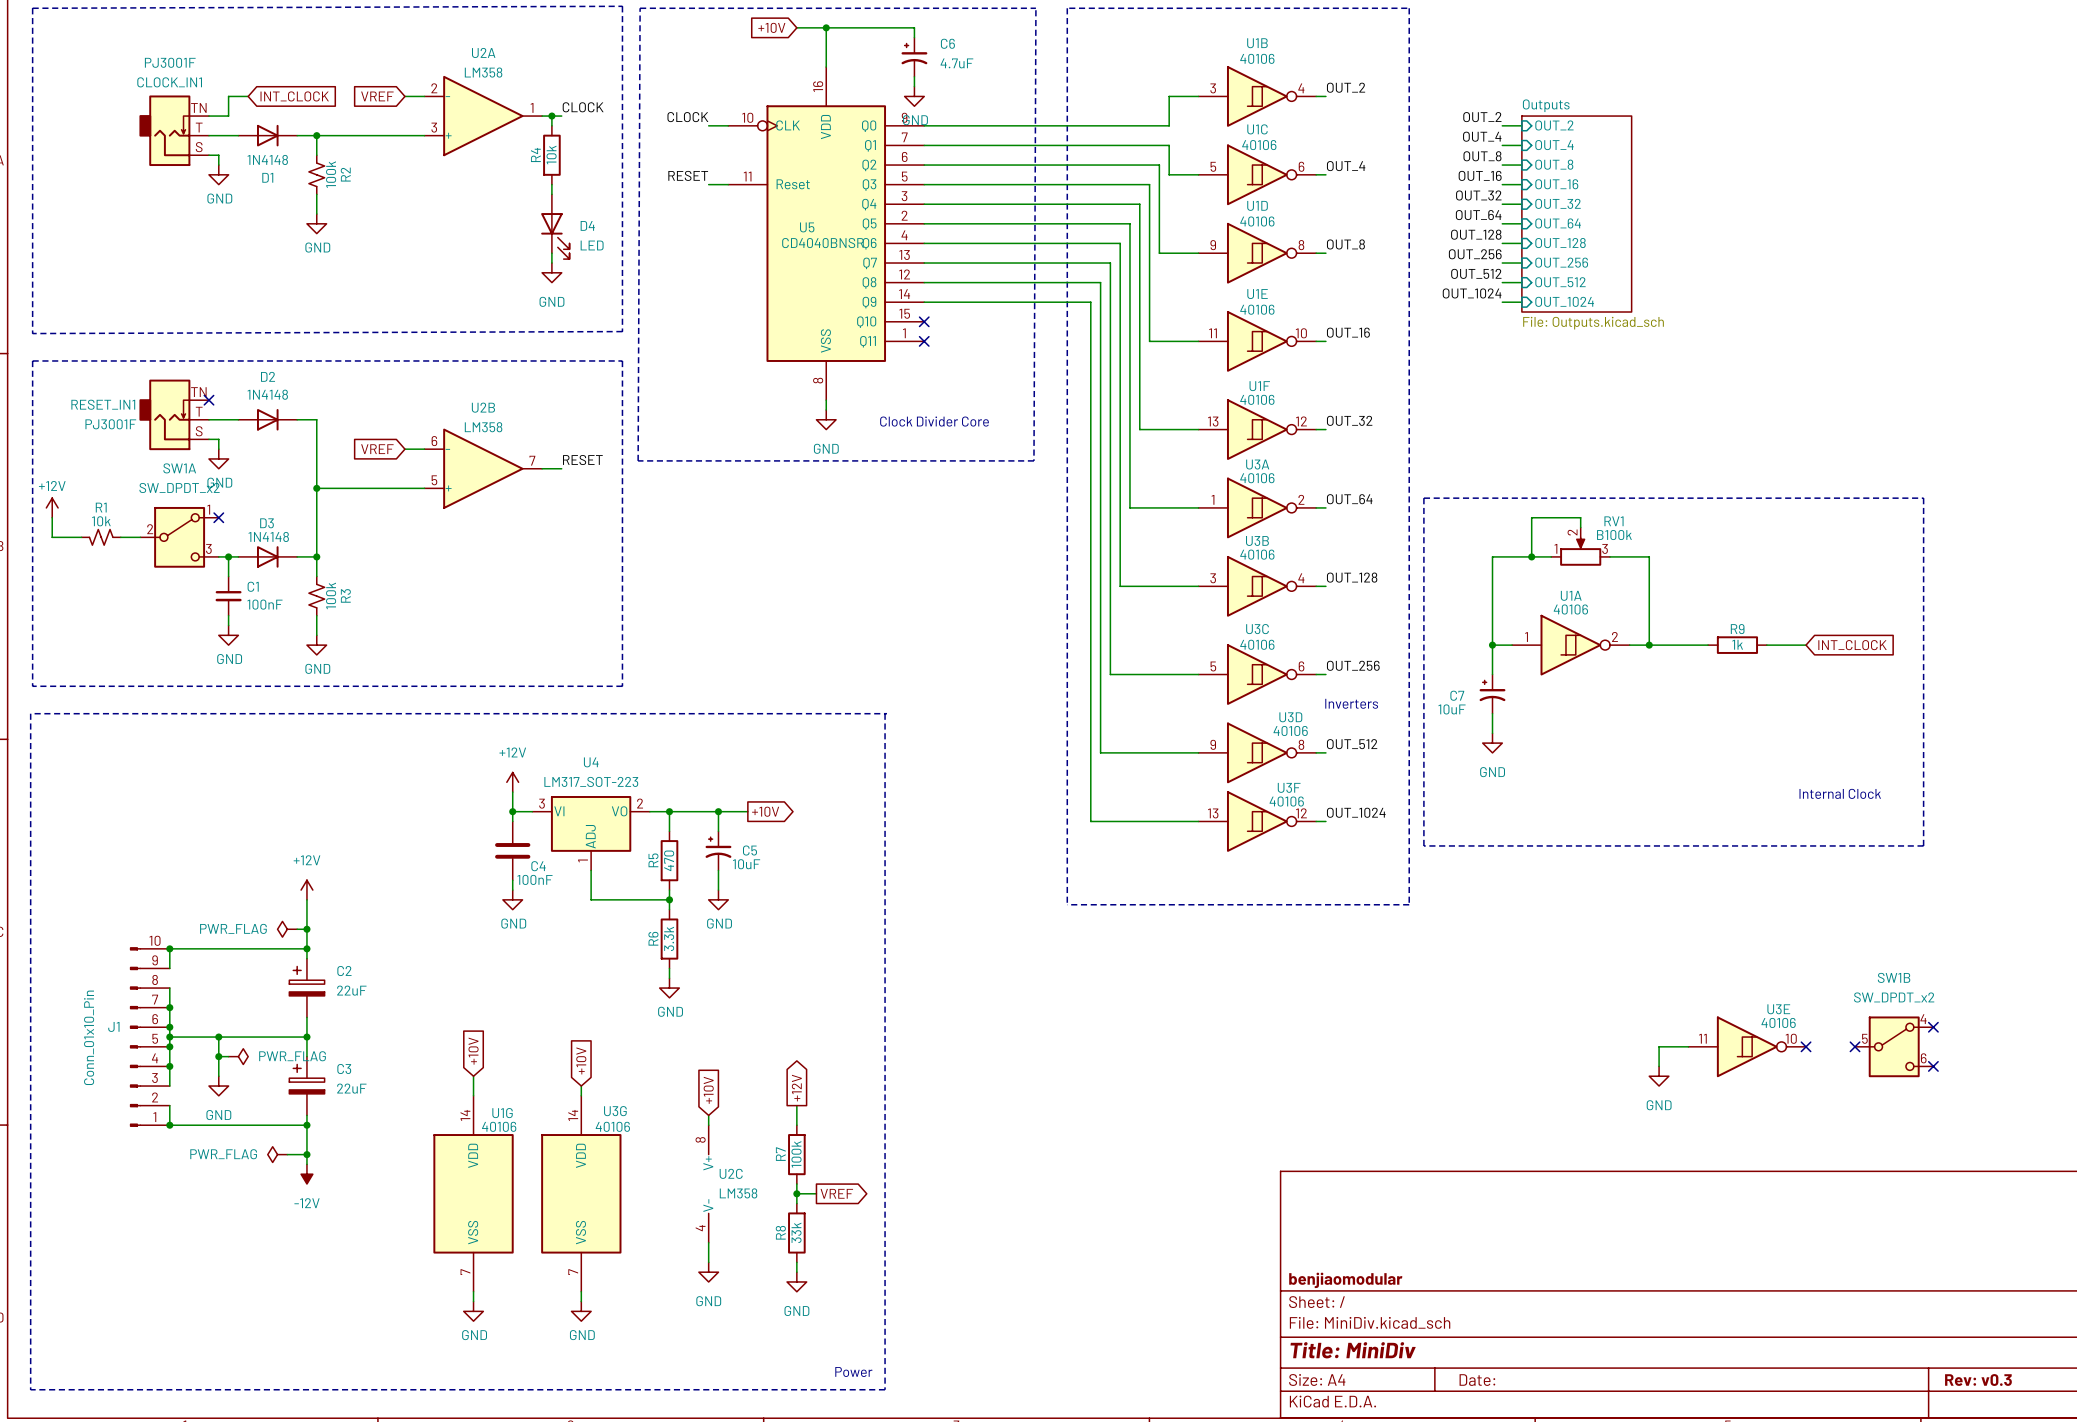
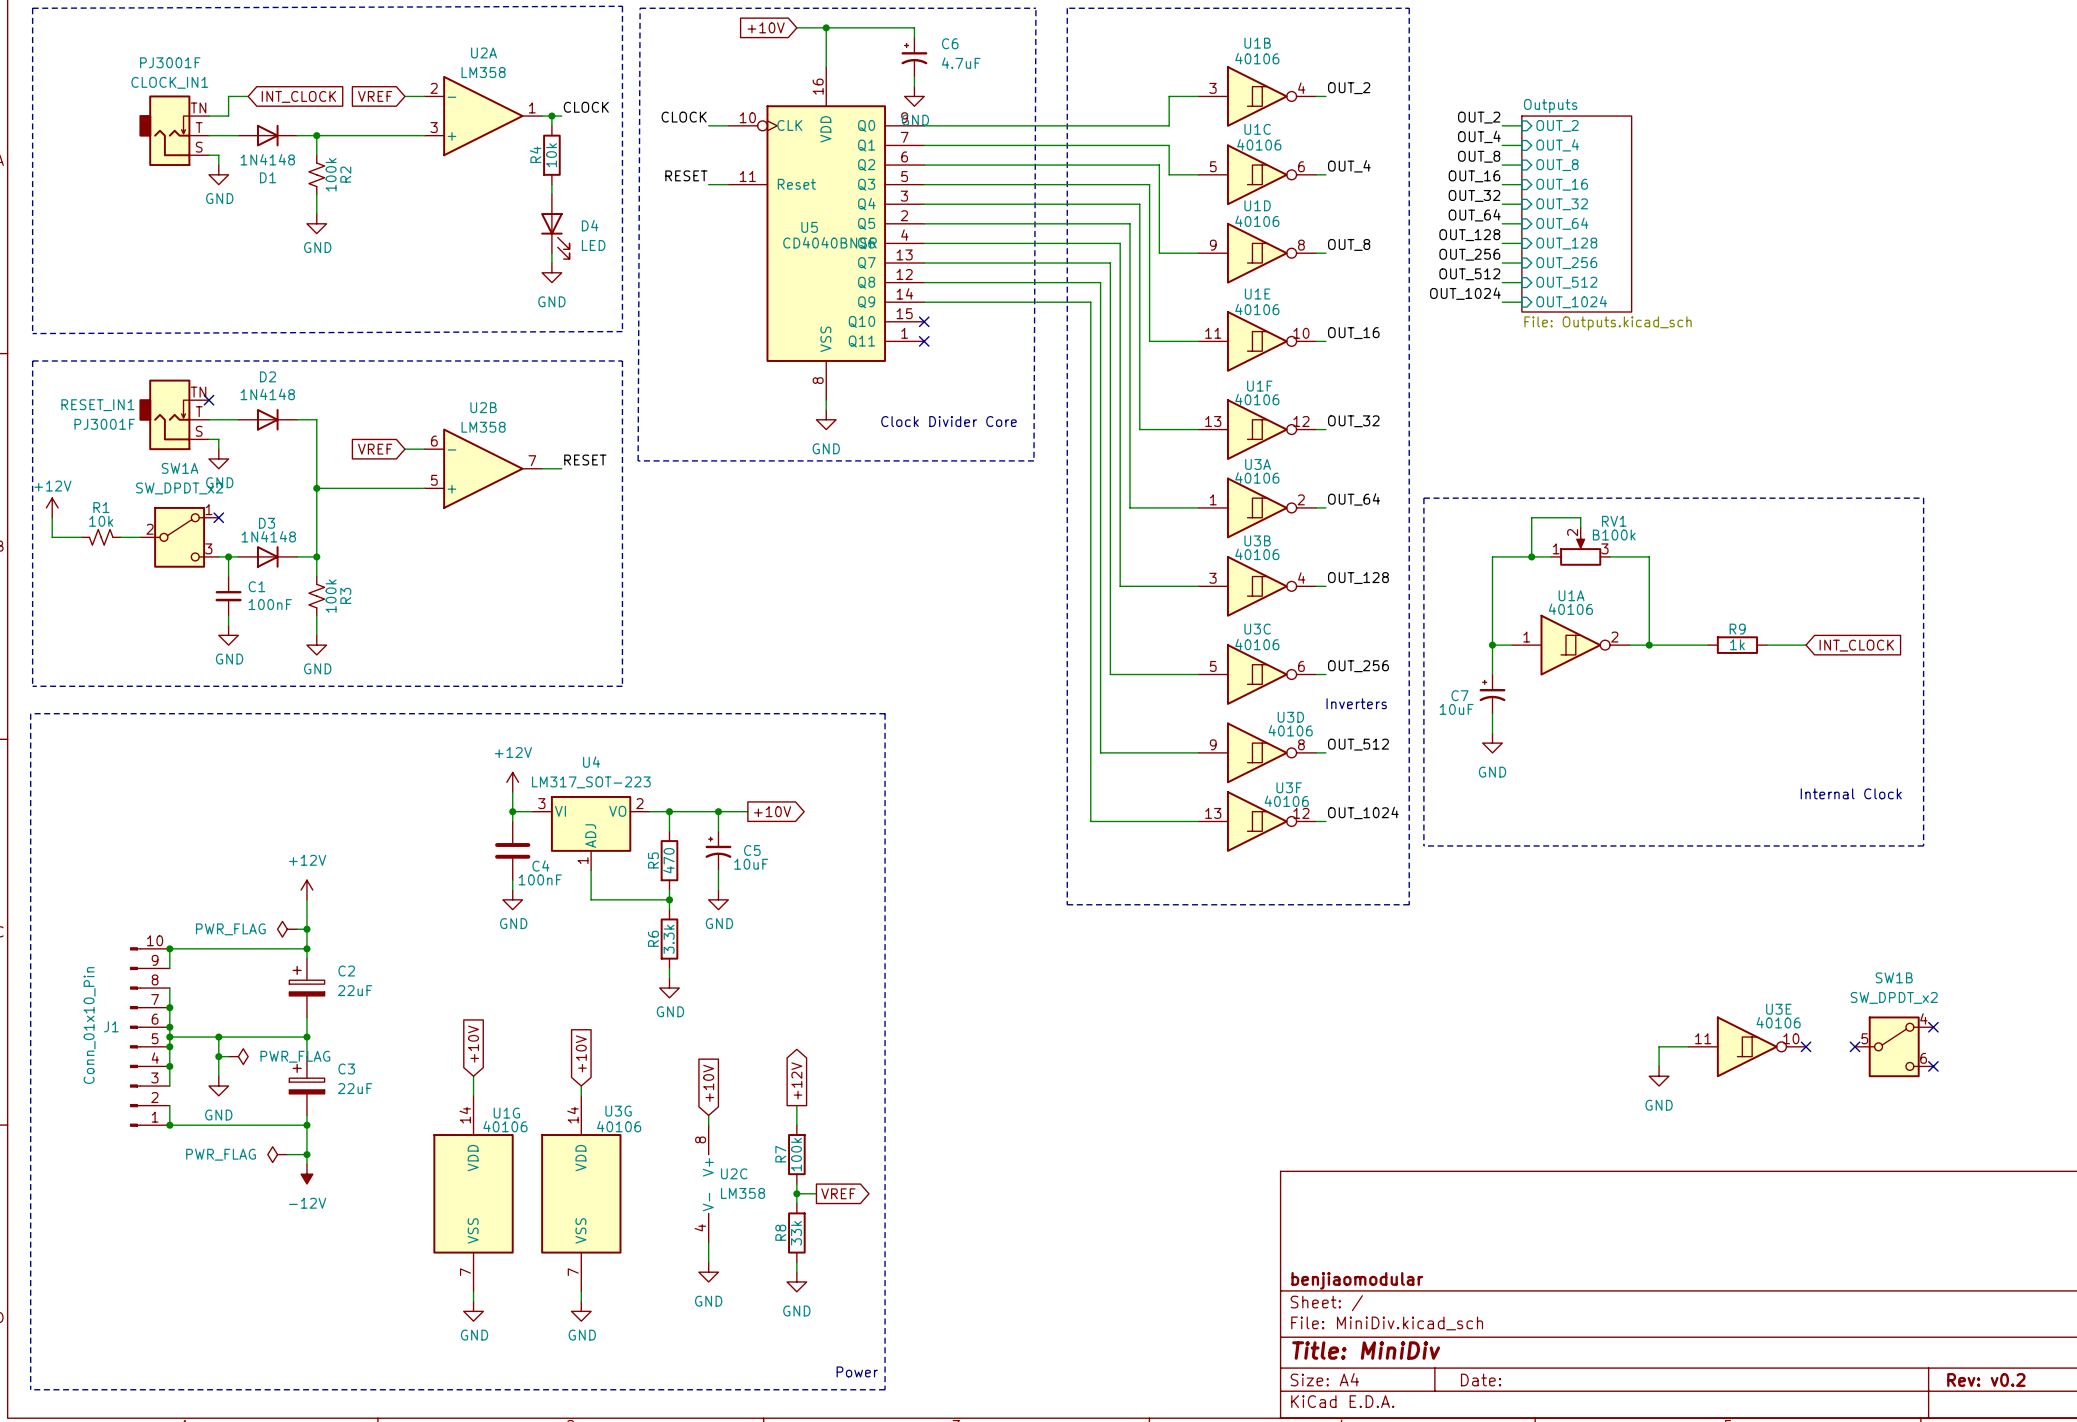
title block: Rev: v0.3 (1978, 1380) -> Rev: v0.2 (1986, 1379)

